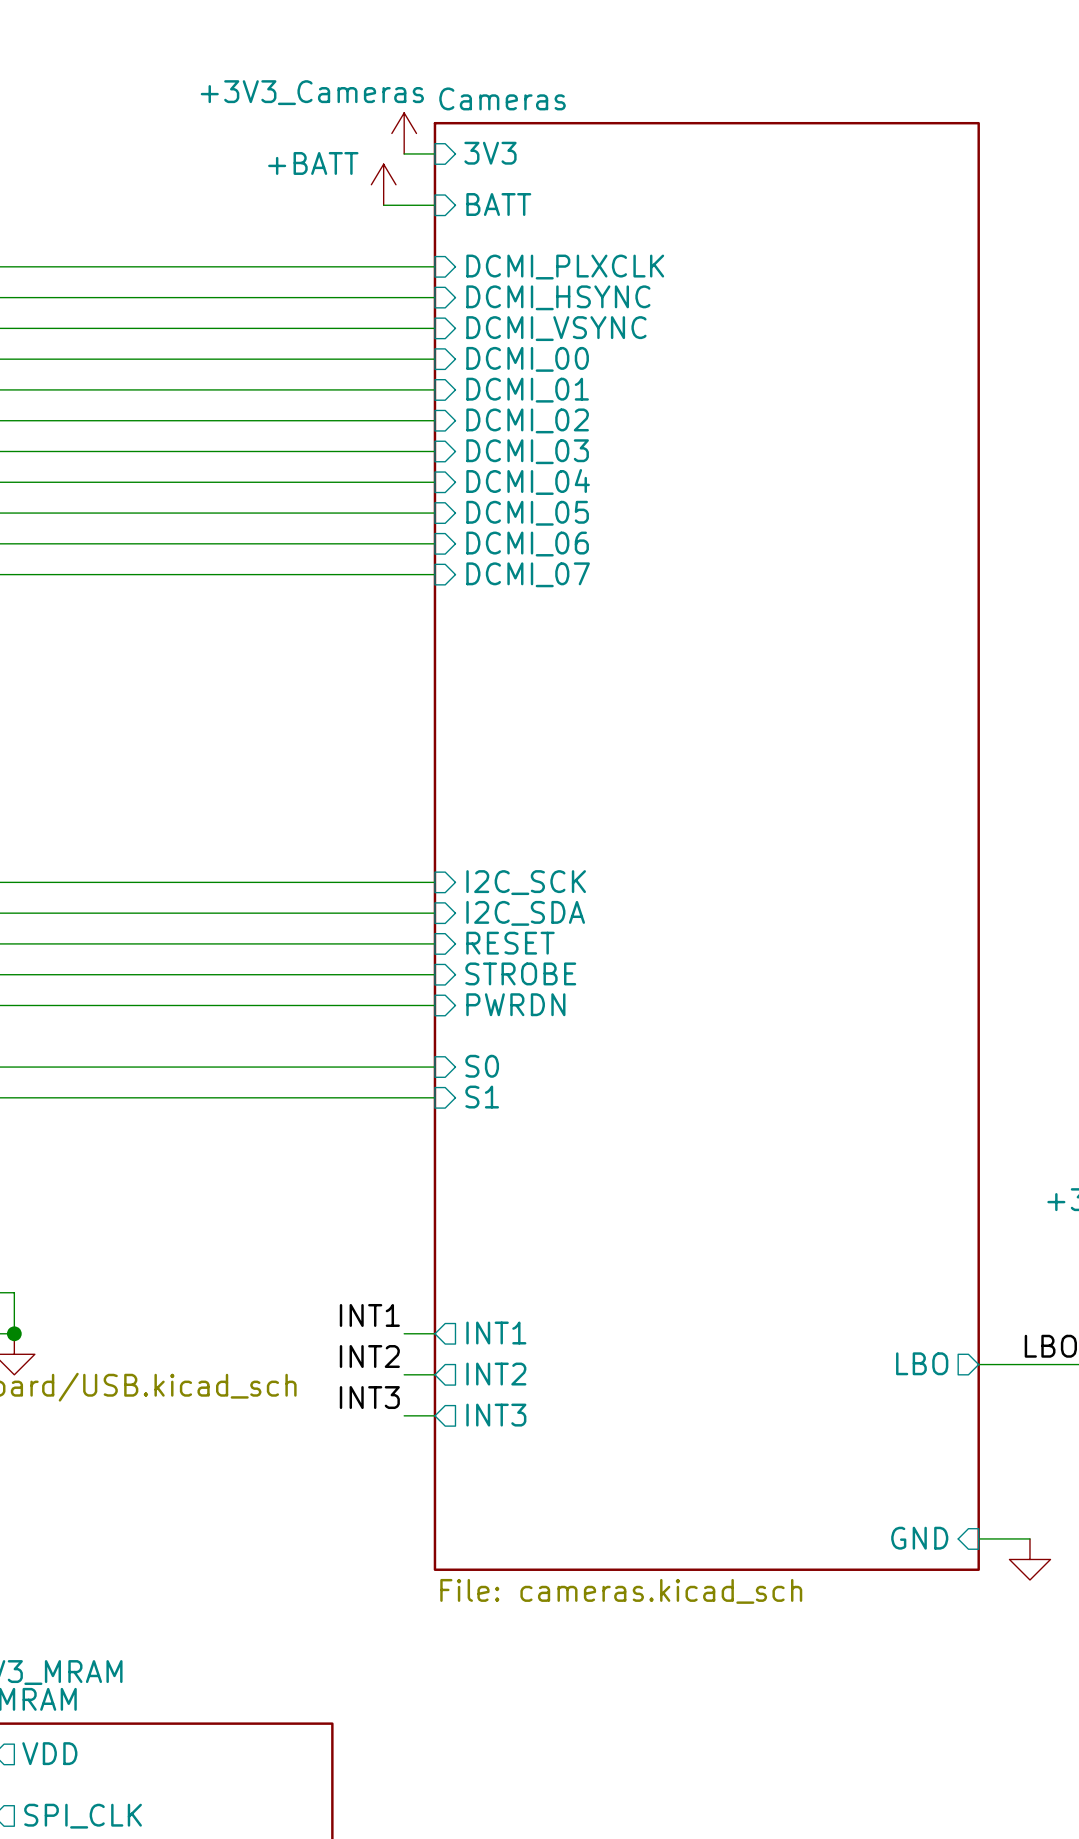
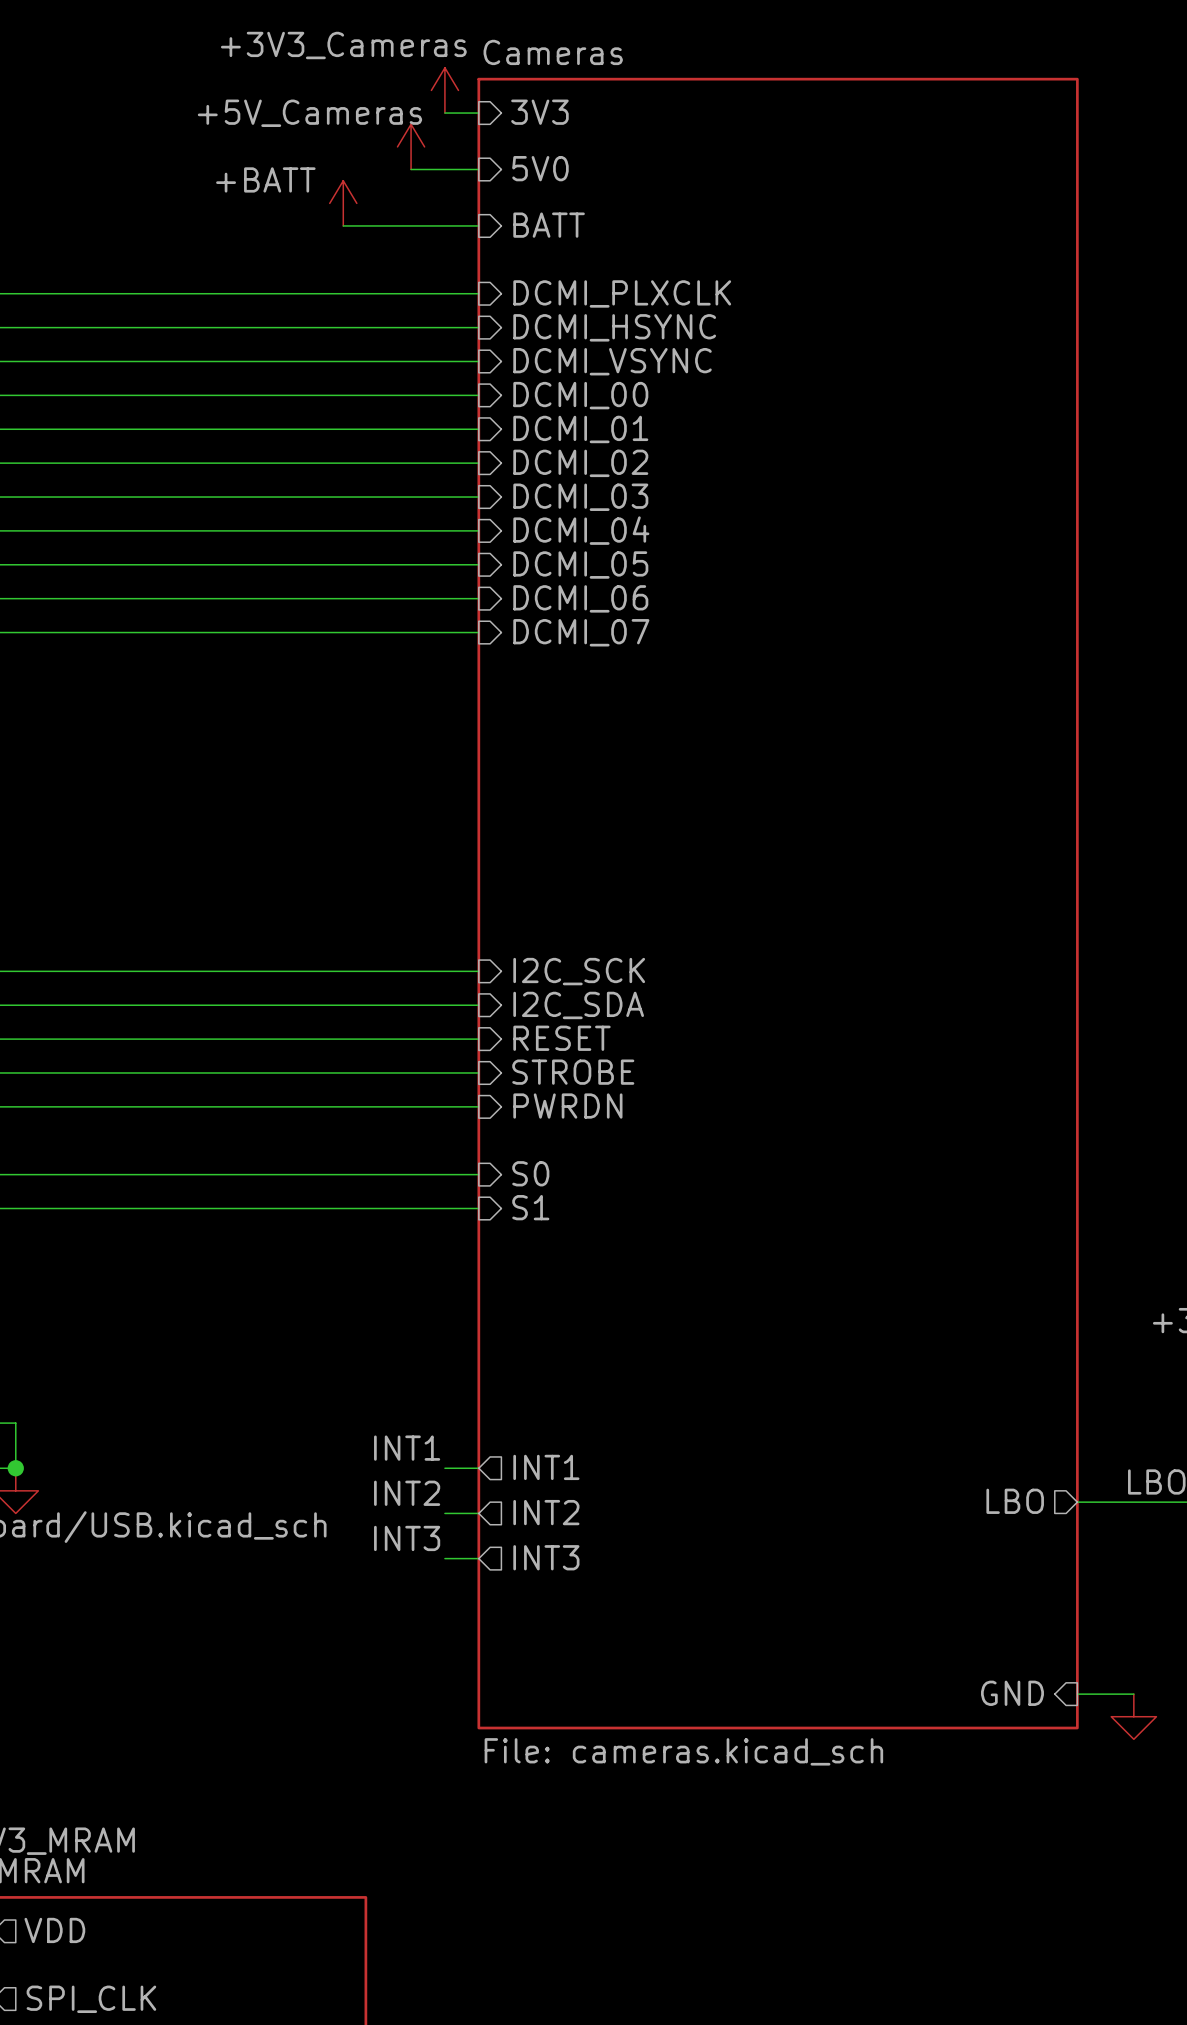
sheet pin: none -> 3V3 (539, 112)
wire: none -> (444, 113) (478, 113)
power symbol: none -> +5V_Cameras (411, 146)
power symbol position: +3V3_Cameras (404, 133) -> +3V3_Cameras (444, 90)
wire: none -> (411, 169) (444, 169)
sheet pin: 3V3 (490, 153) -> 5V0 (540, 168)
power symbol position: +BATT (383, 184) -> +BATT (343, 203)
wire: none -> (343, 225) (422, 225)
sheet Cameras: none -> File: cameras.kicad_sch (778, 903)
sheet Cameras: File: cameras.kicad_sch (706, 846) -> none

